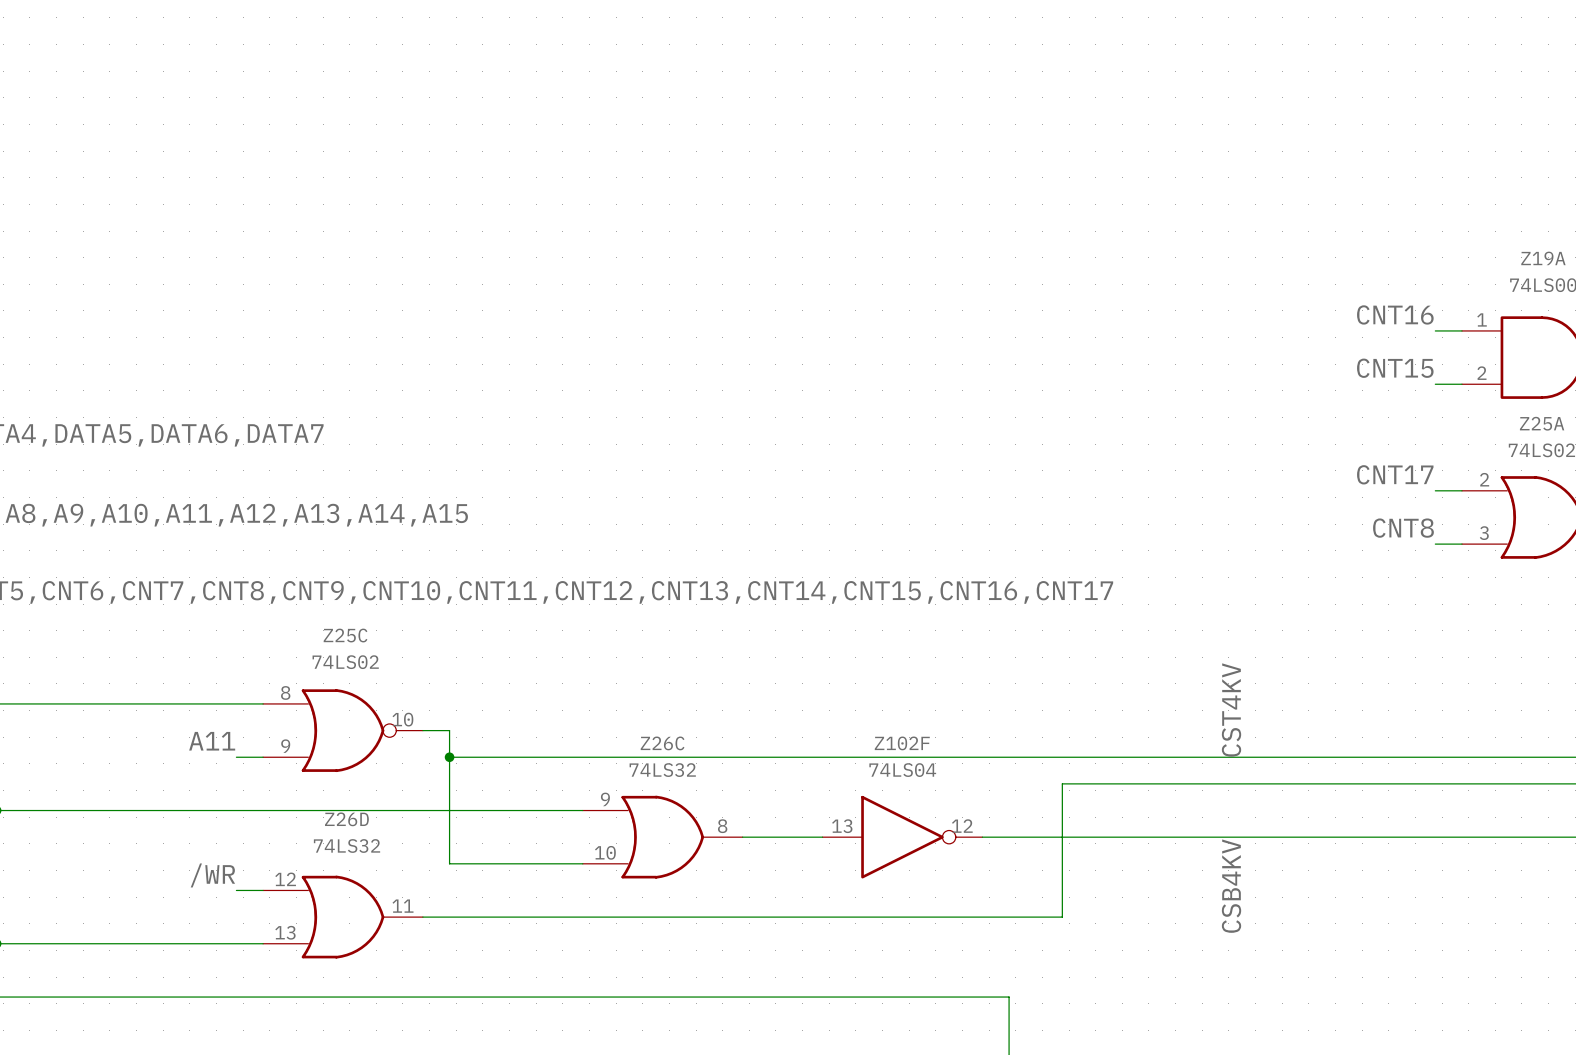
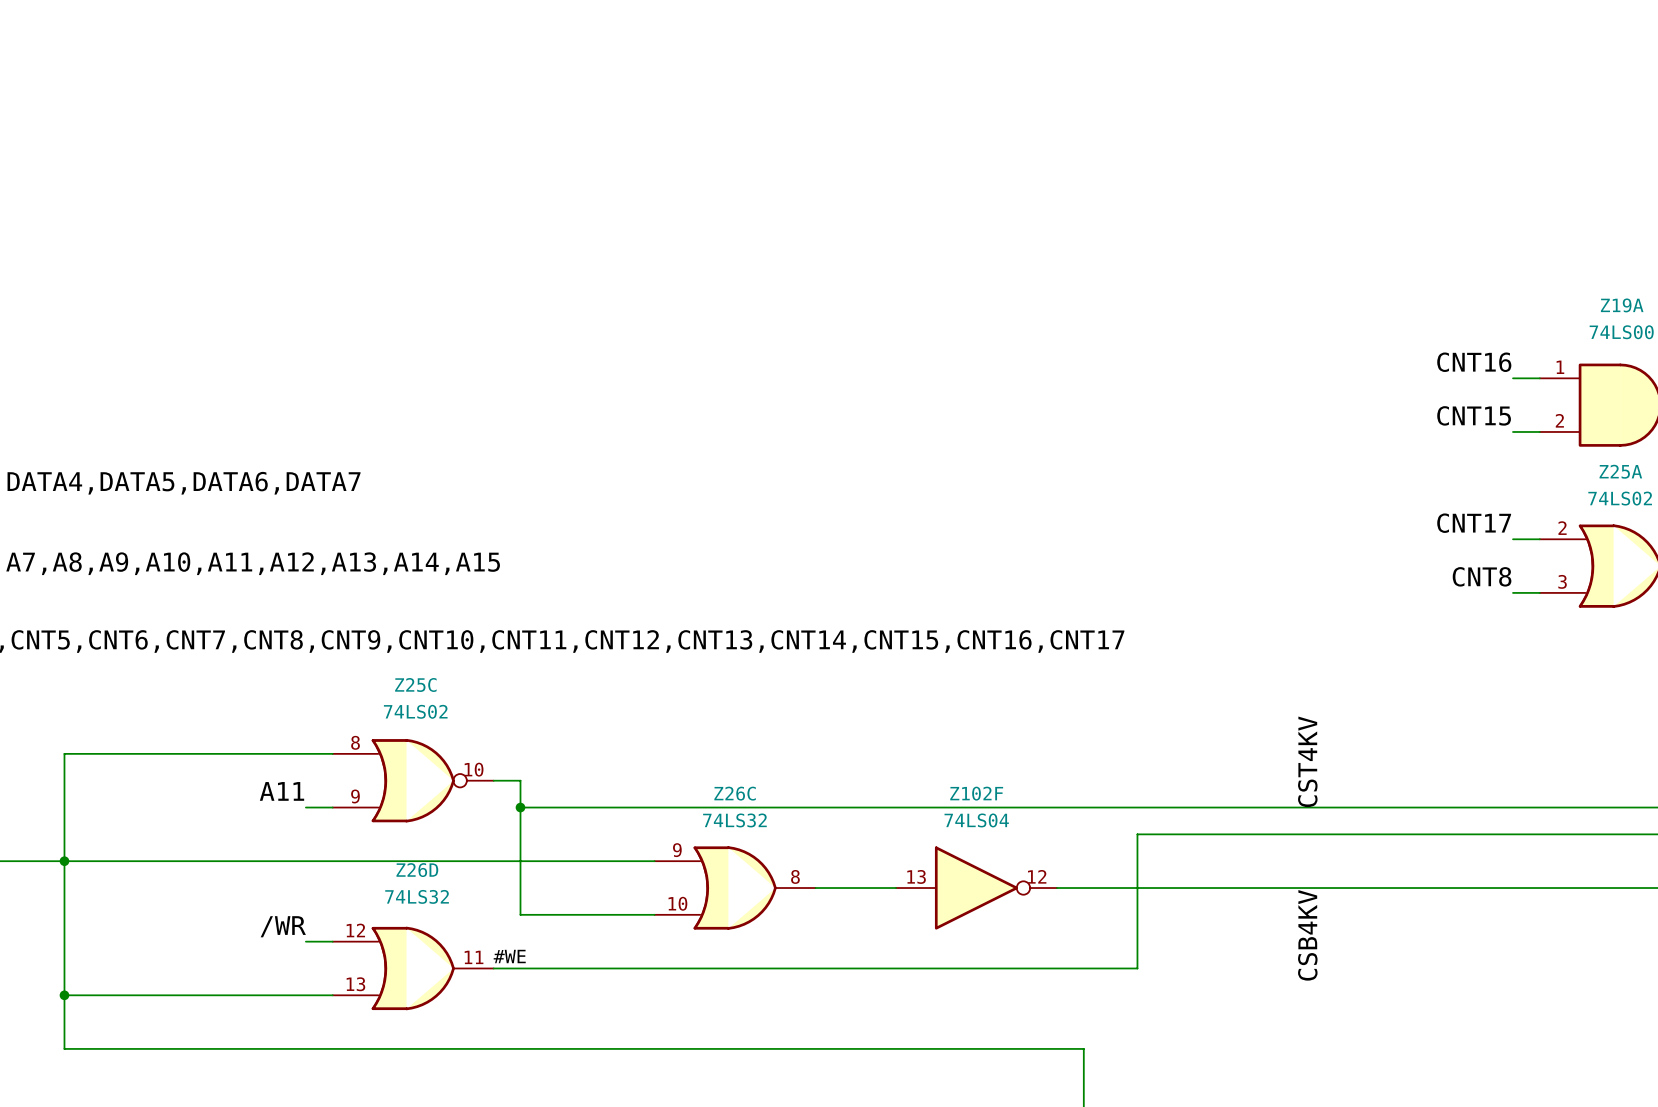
label: none -> #WE (509, 956)

